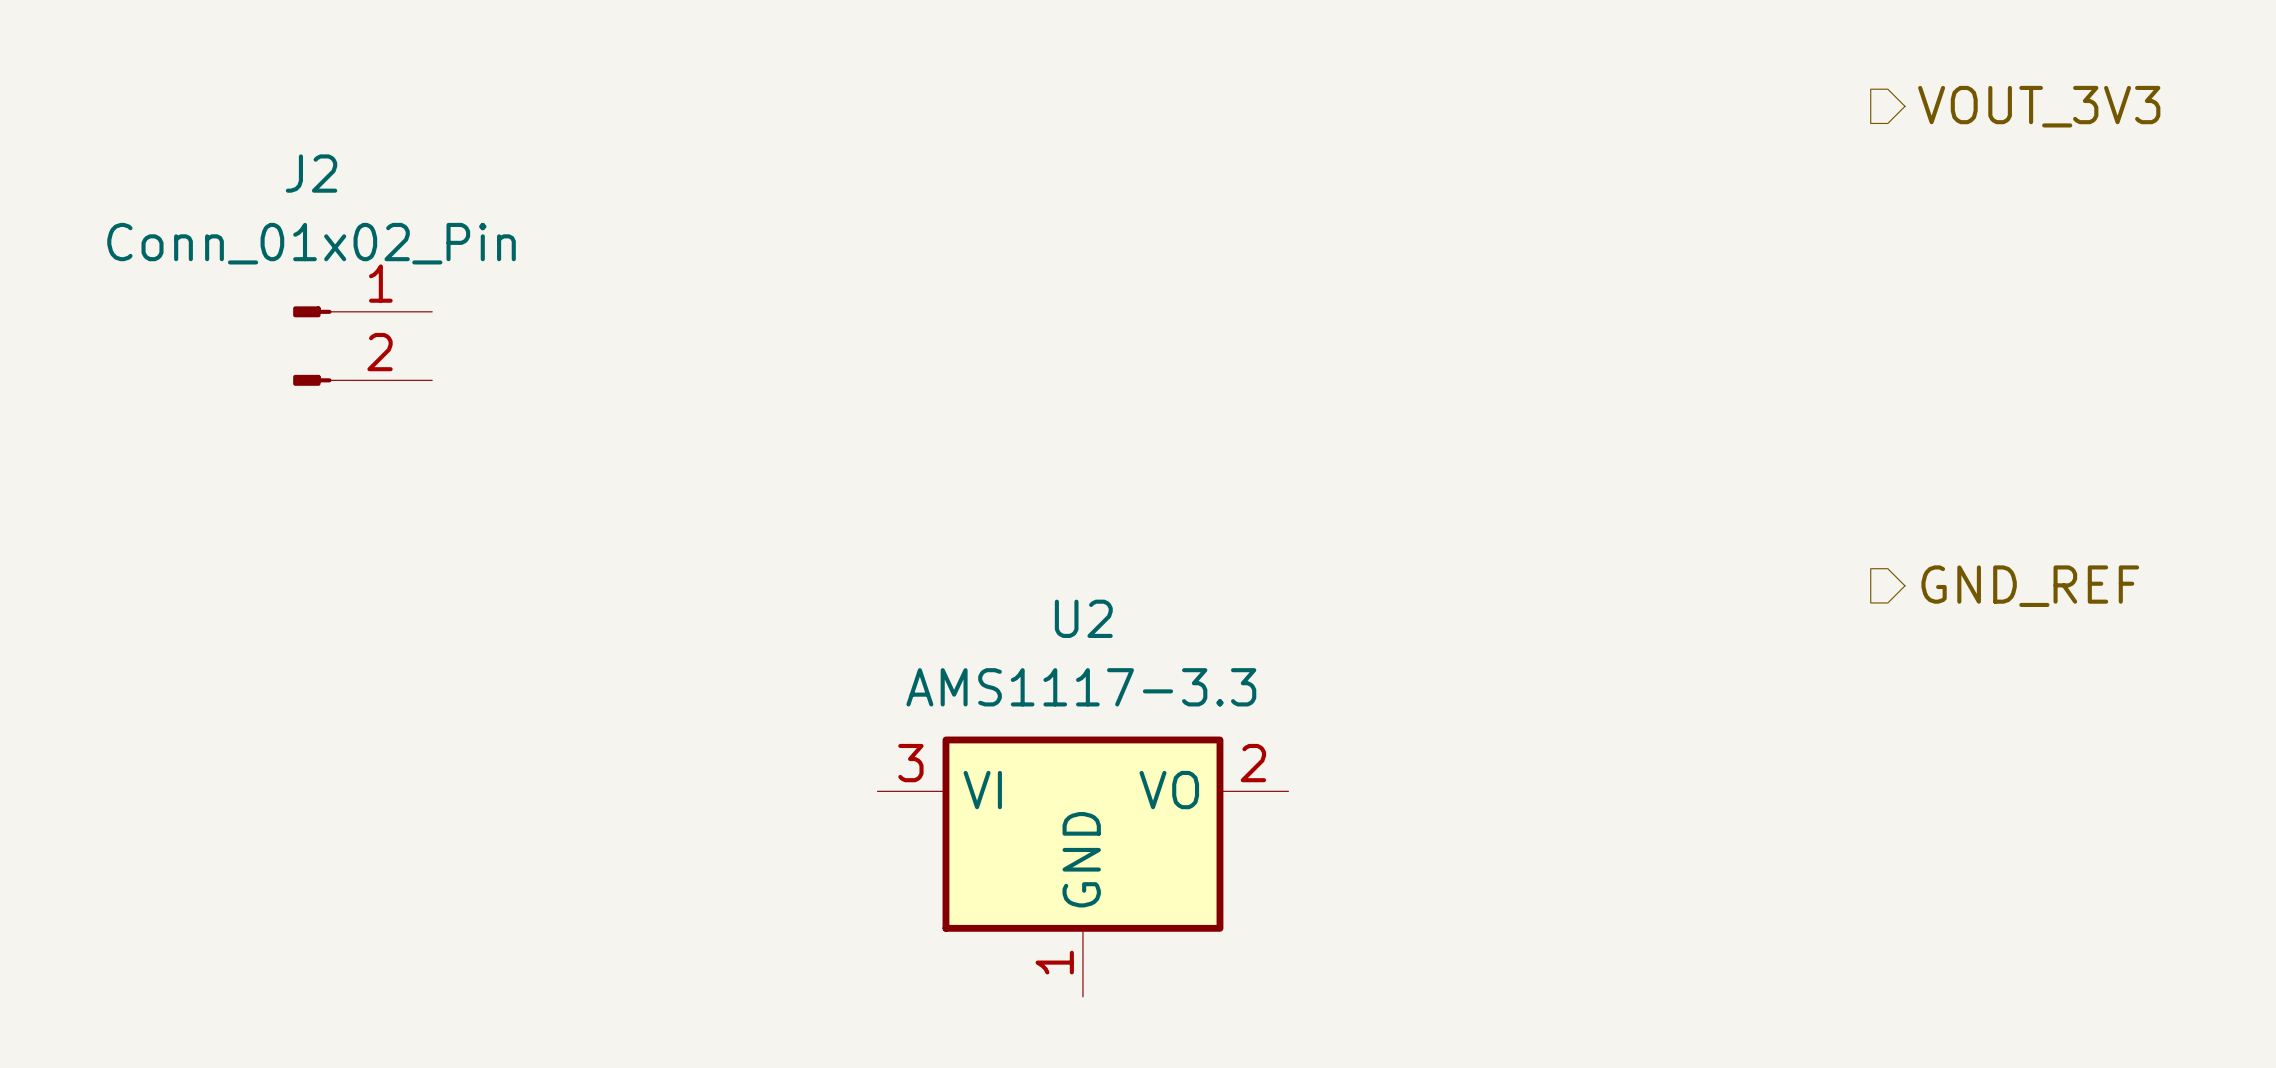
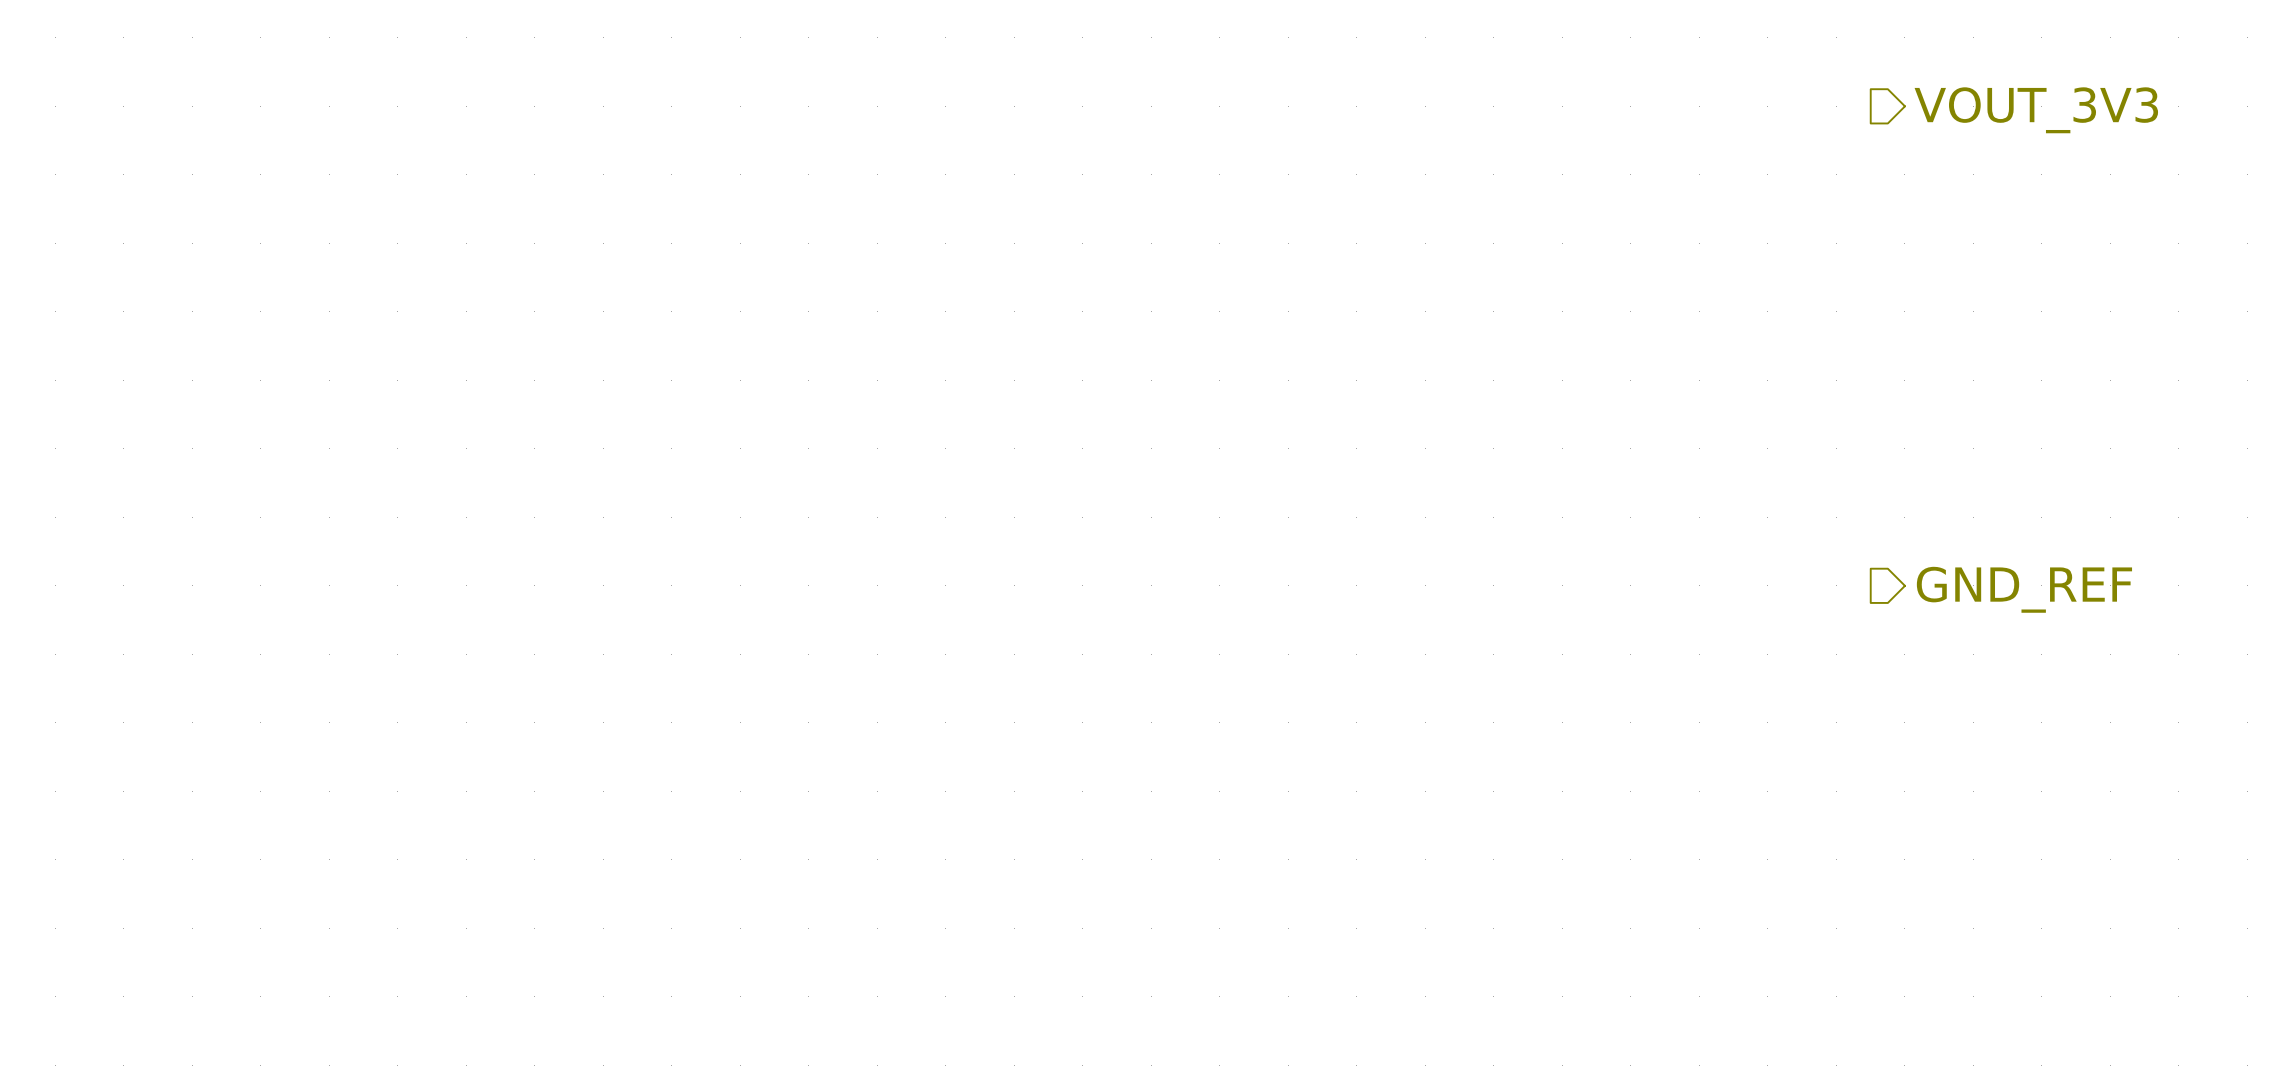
J2: Conn_01x02_Pin (362, 346) -> none
U2: AMS1117-3.3 (1082, 866) -> none

